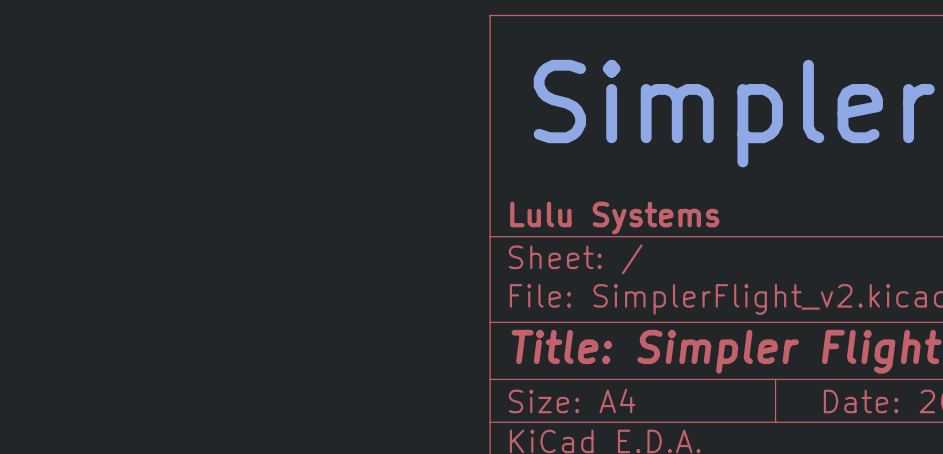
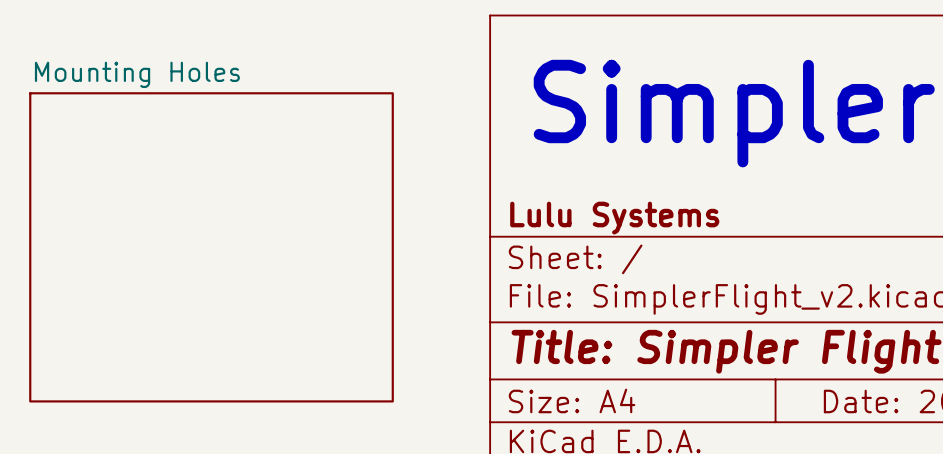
sheet Mounting Holes: none -> (211, 247)

